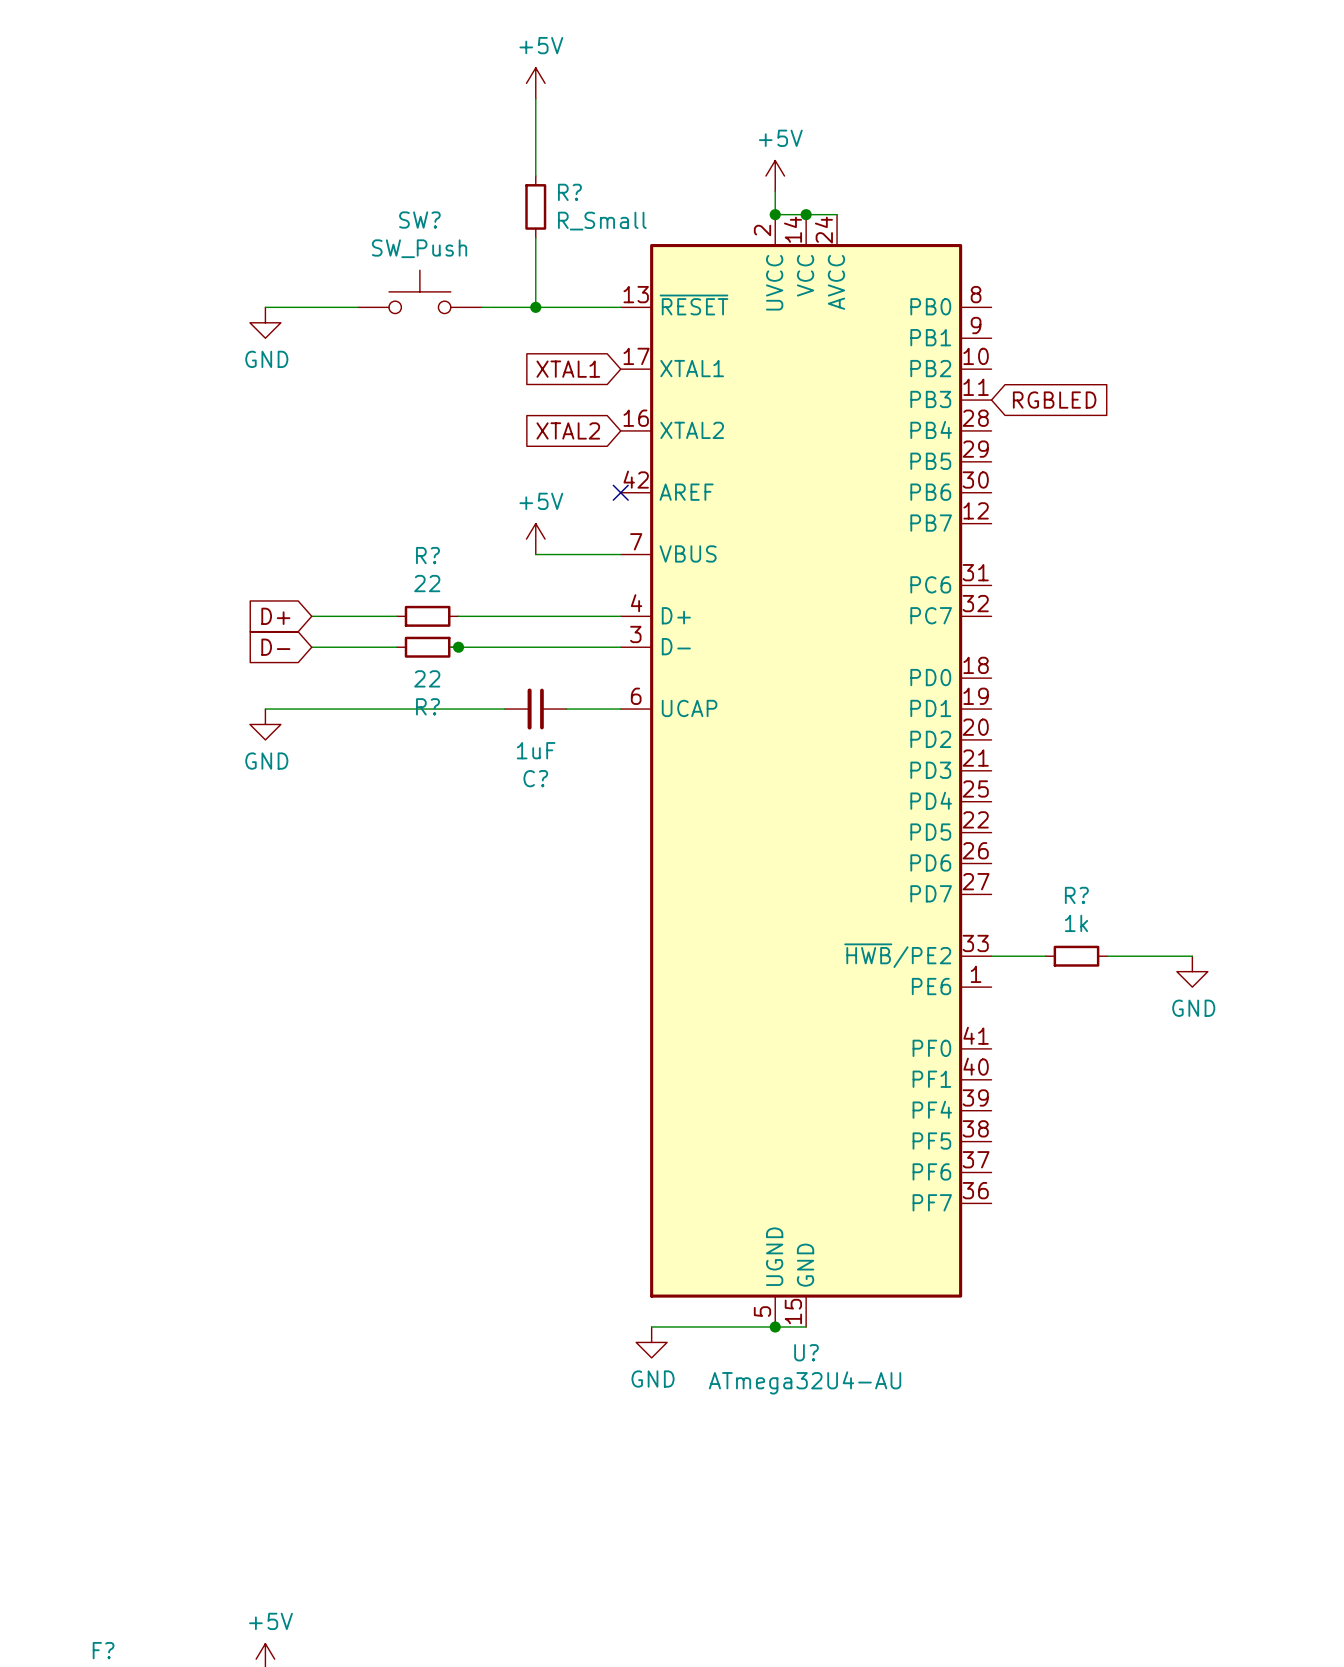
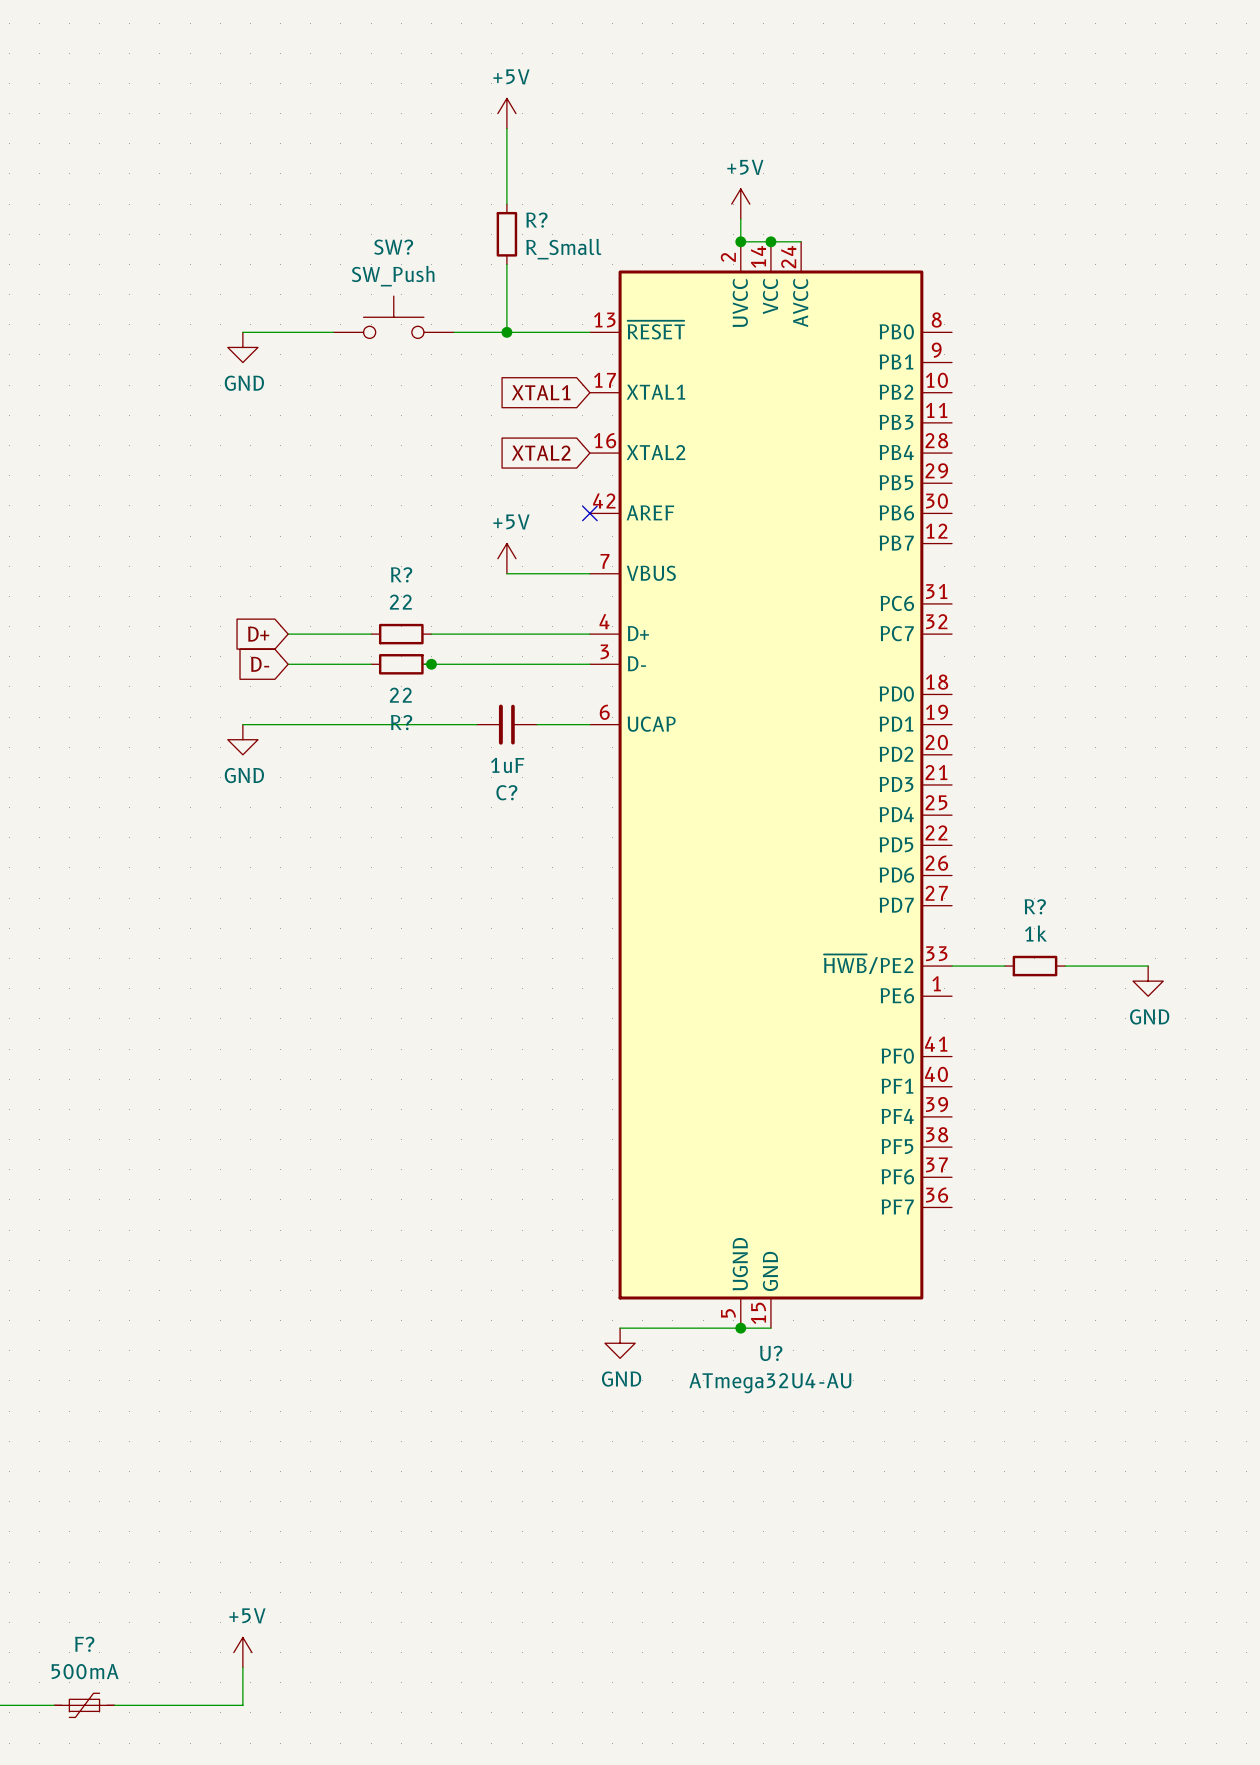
global label: RGBLED (1054, 400) -> none

